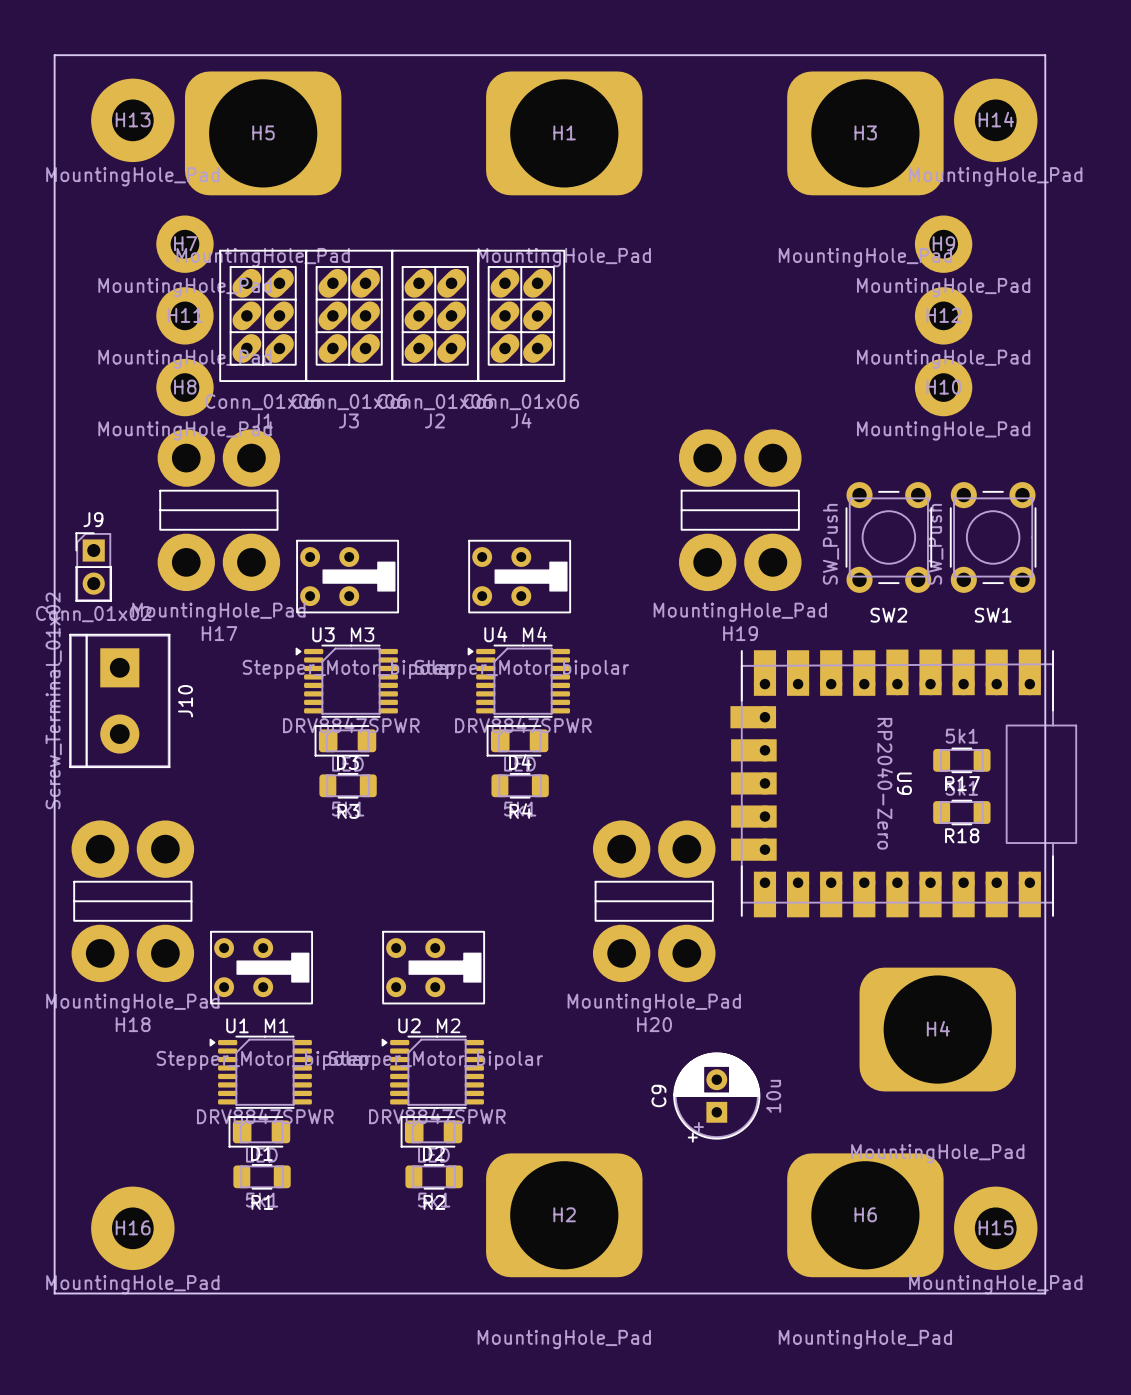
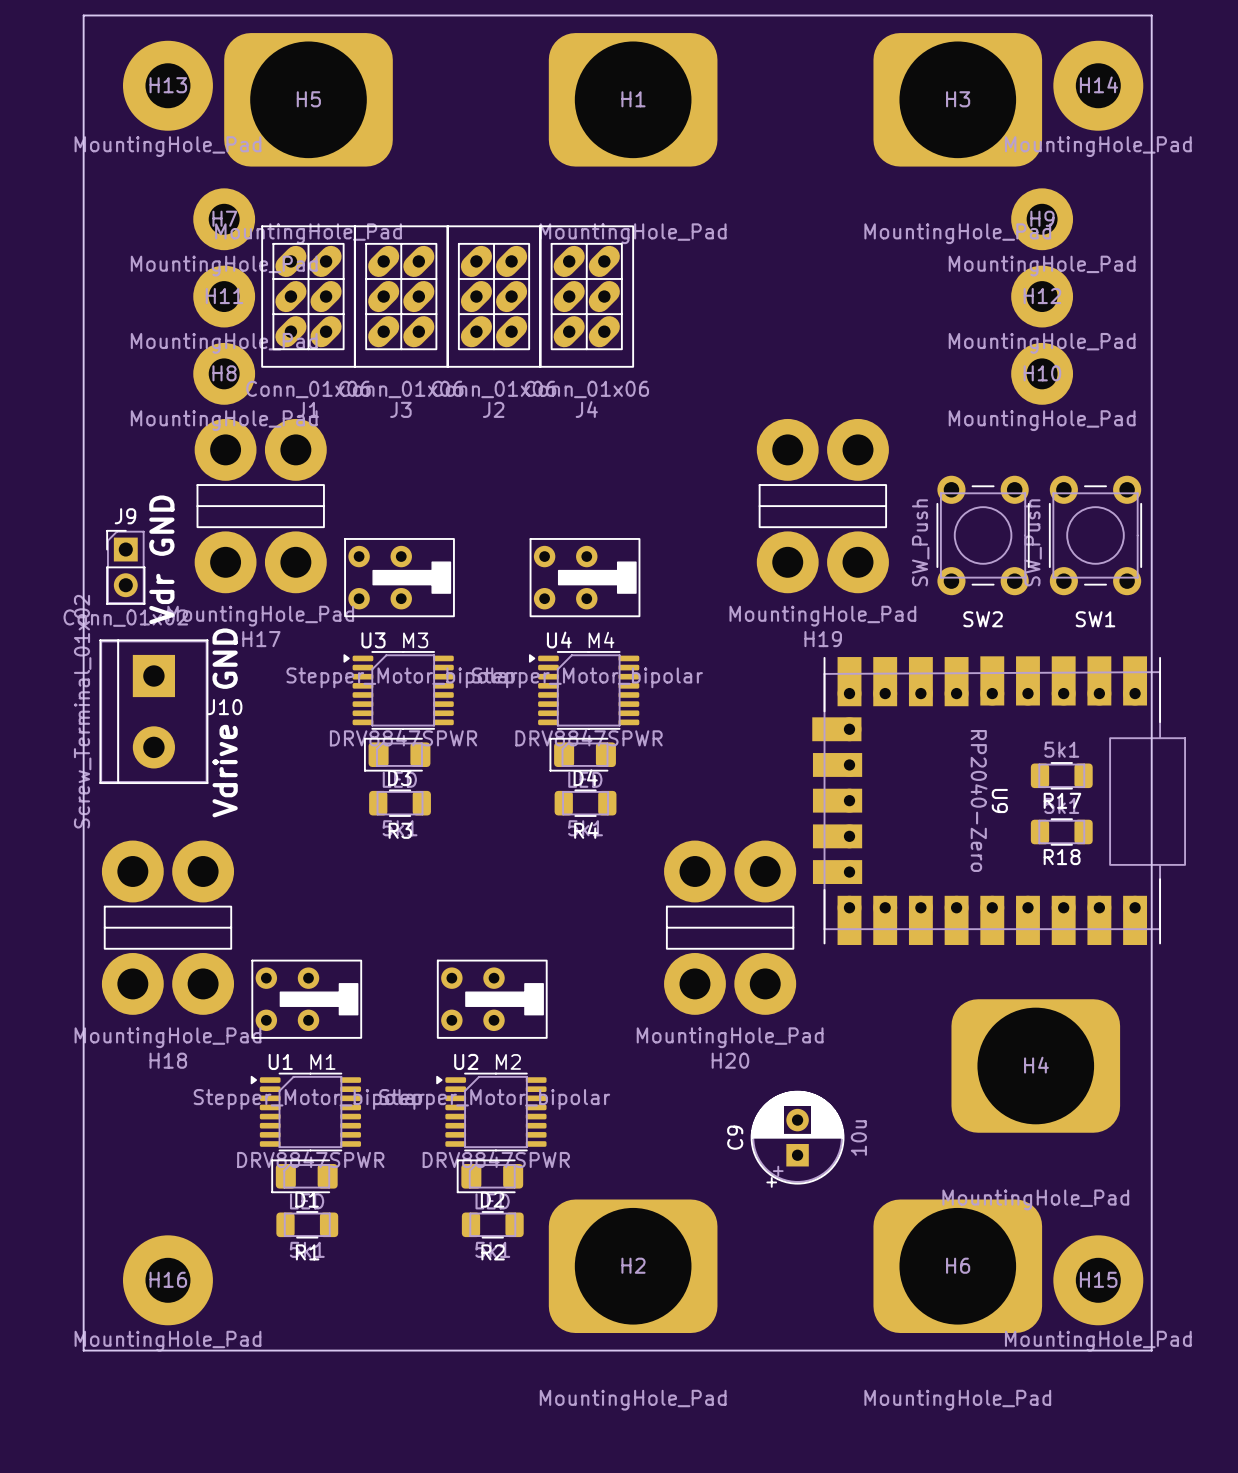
text: none -> Vdr GND (161, 559)
J10 name rotation: 0° (185, 701) -> 90° clockwise (224, 707)
text: none -> Vdrive GND (225, 722)

